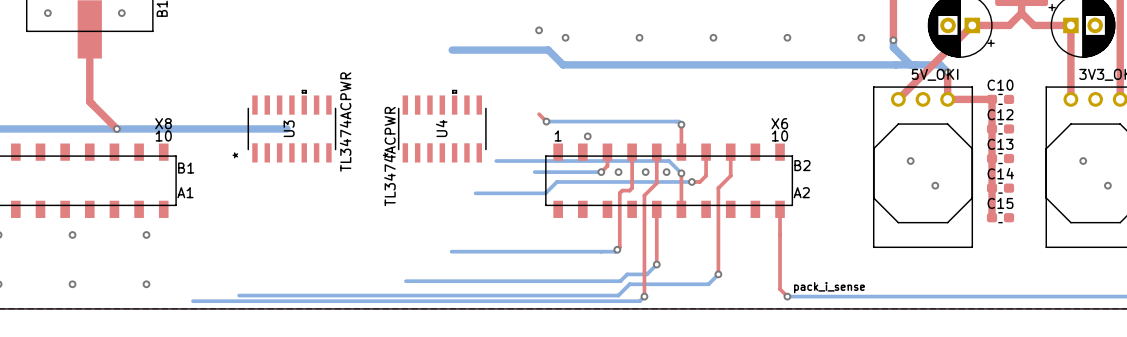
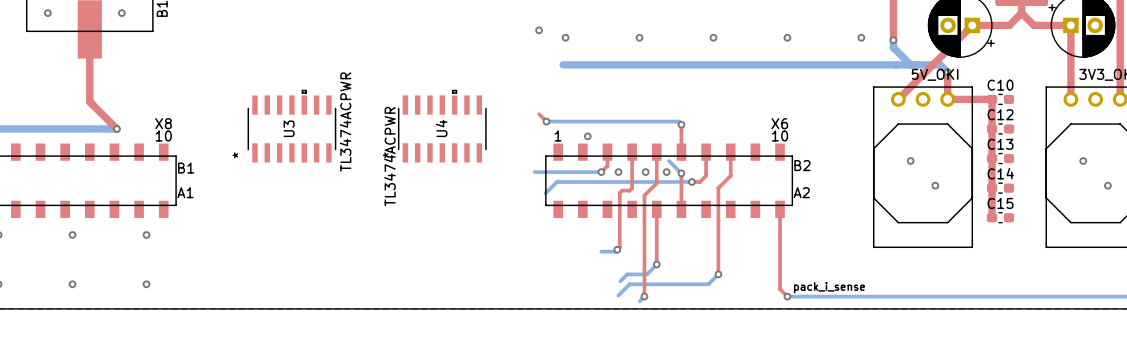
bottom track: (452, 50) (548, 50) (563, 64) -> none
bottom track: (116, 128) (287, 128) -> none
bottom track: (496, 161) (669, 161) -> none
bottom track: (475, 193) (545, 193) -> none
bottom track: (451, 251) (601, 251) -> none
bottom track: (405, 281) (620, 281) -> none
bottom track: (239, 295) (618, 295) -> none
bottom track: (192, 301) (639, 301) -> none

